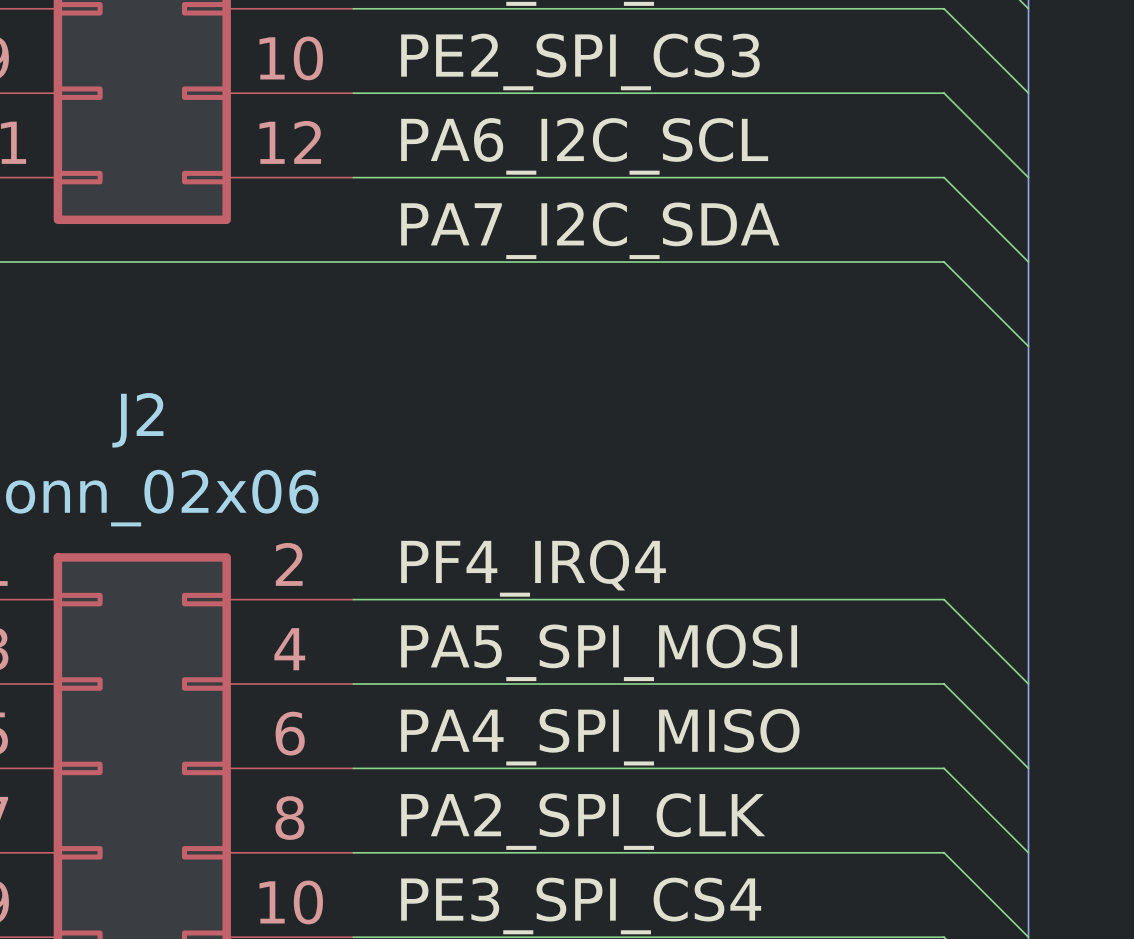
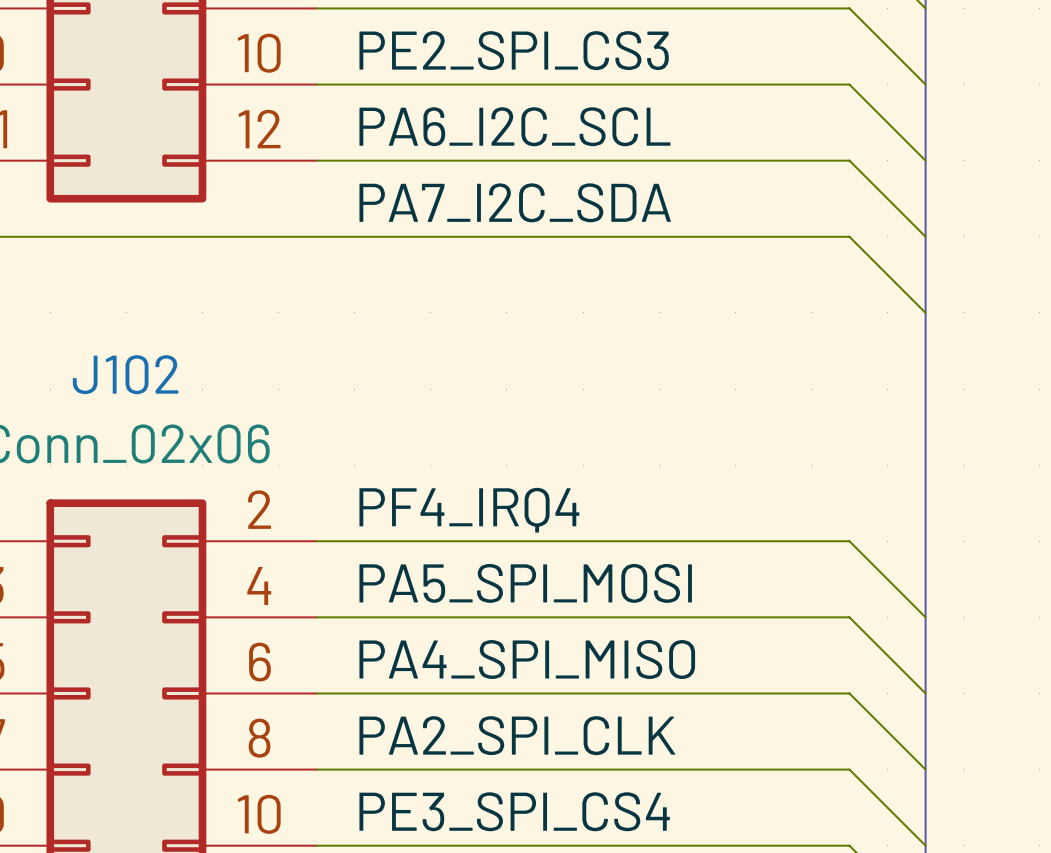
J2 name: J2 (137, 420) -> J102 (125, 374)

